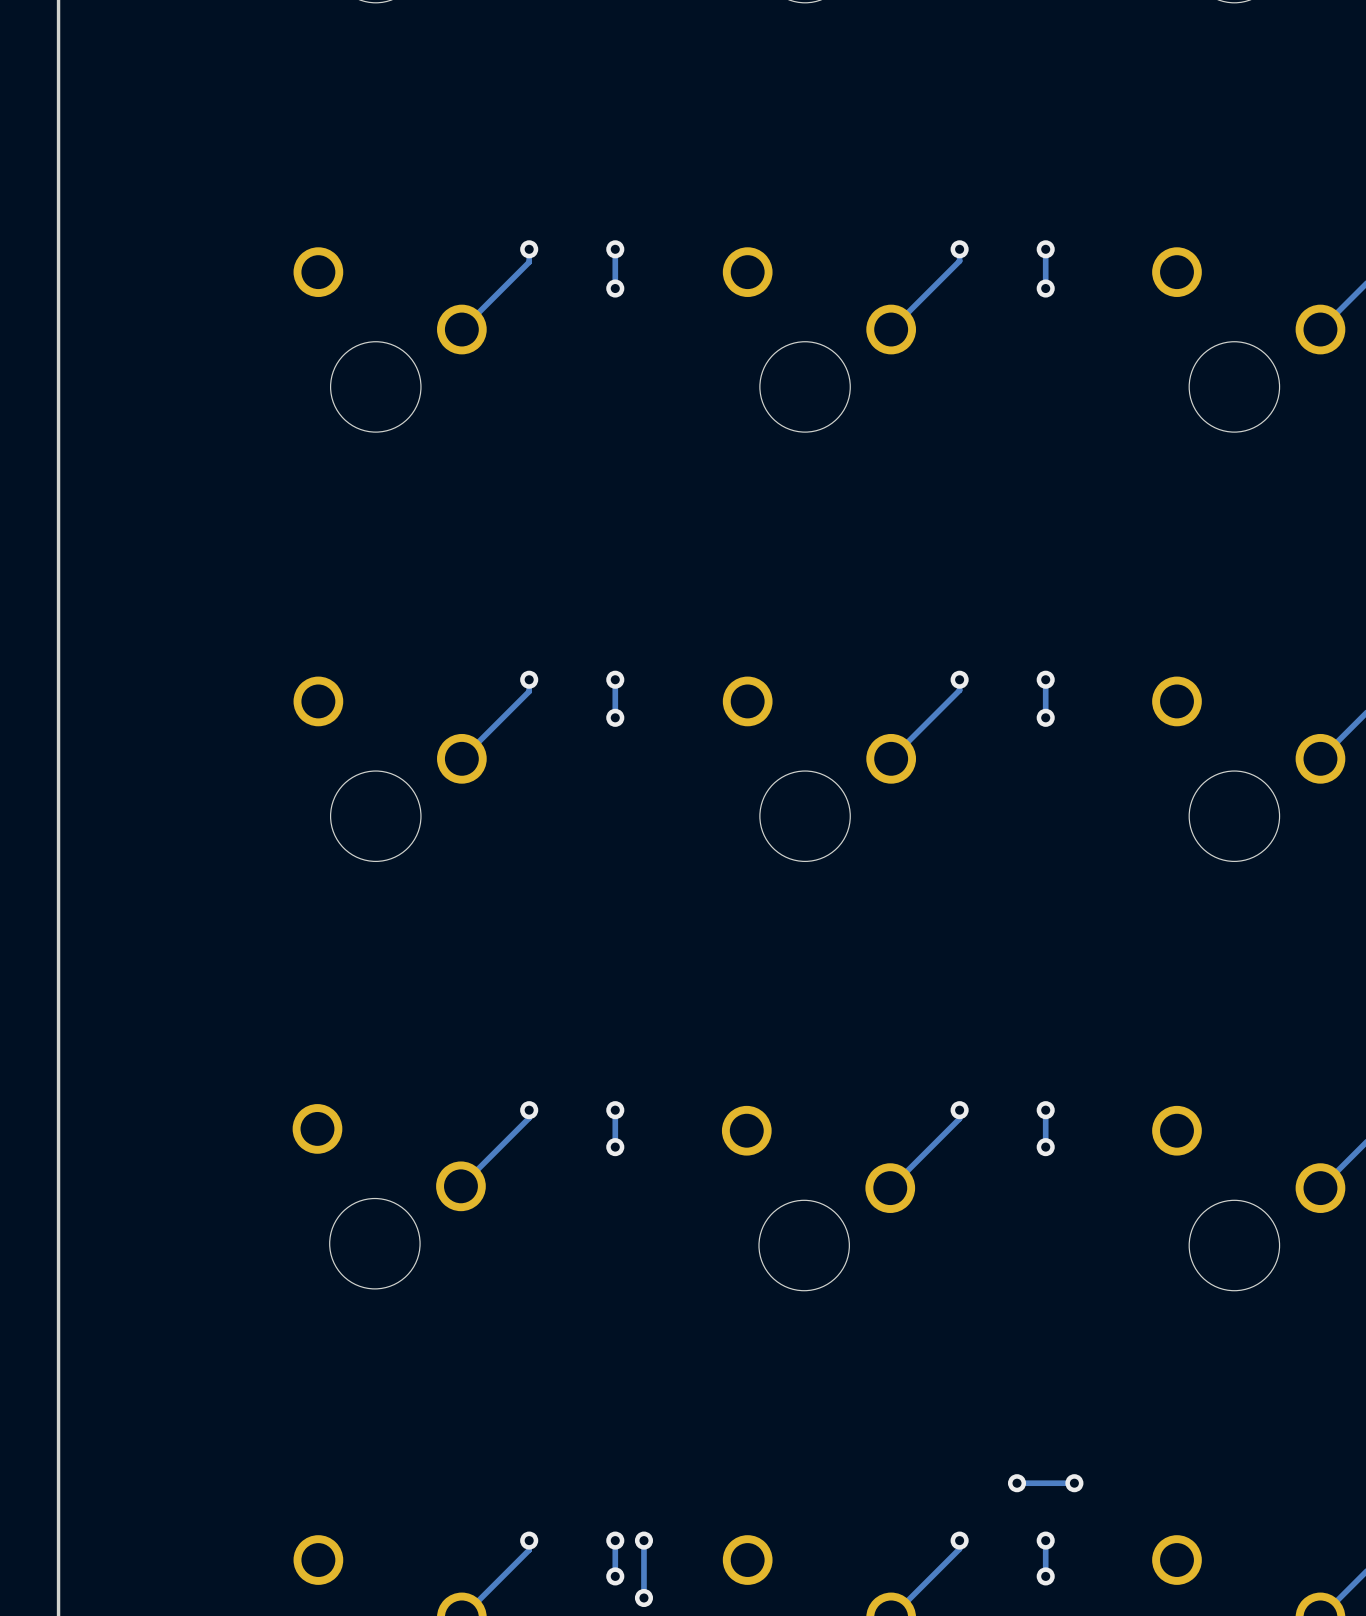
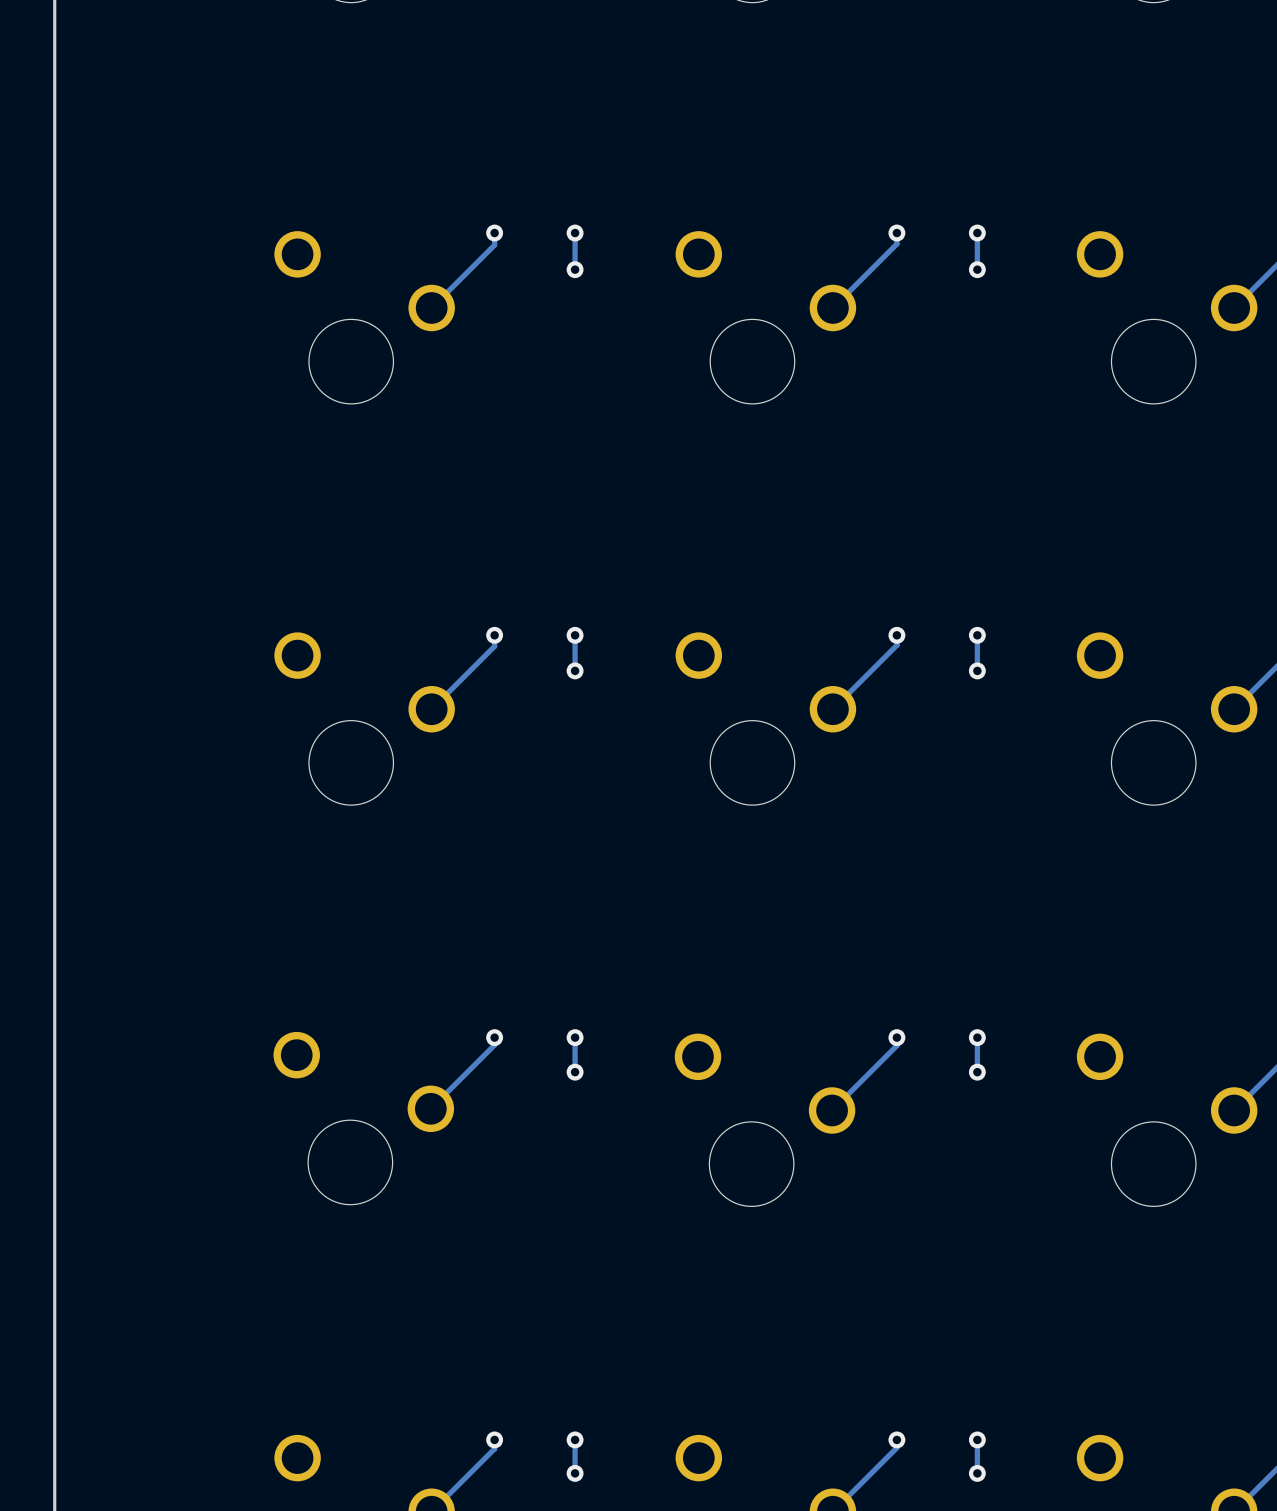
via: (1017, 1483) -> none
track: (1074, 1483) (1017, 1483) -> none
via: (1074, 1483) -> none
track: (643, 1540) (643, 1597) -> none
via: (643, 1540) -> none
via: (643, 1597) -> none

